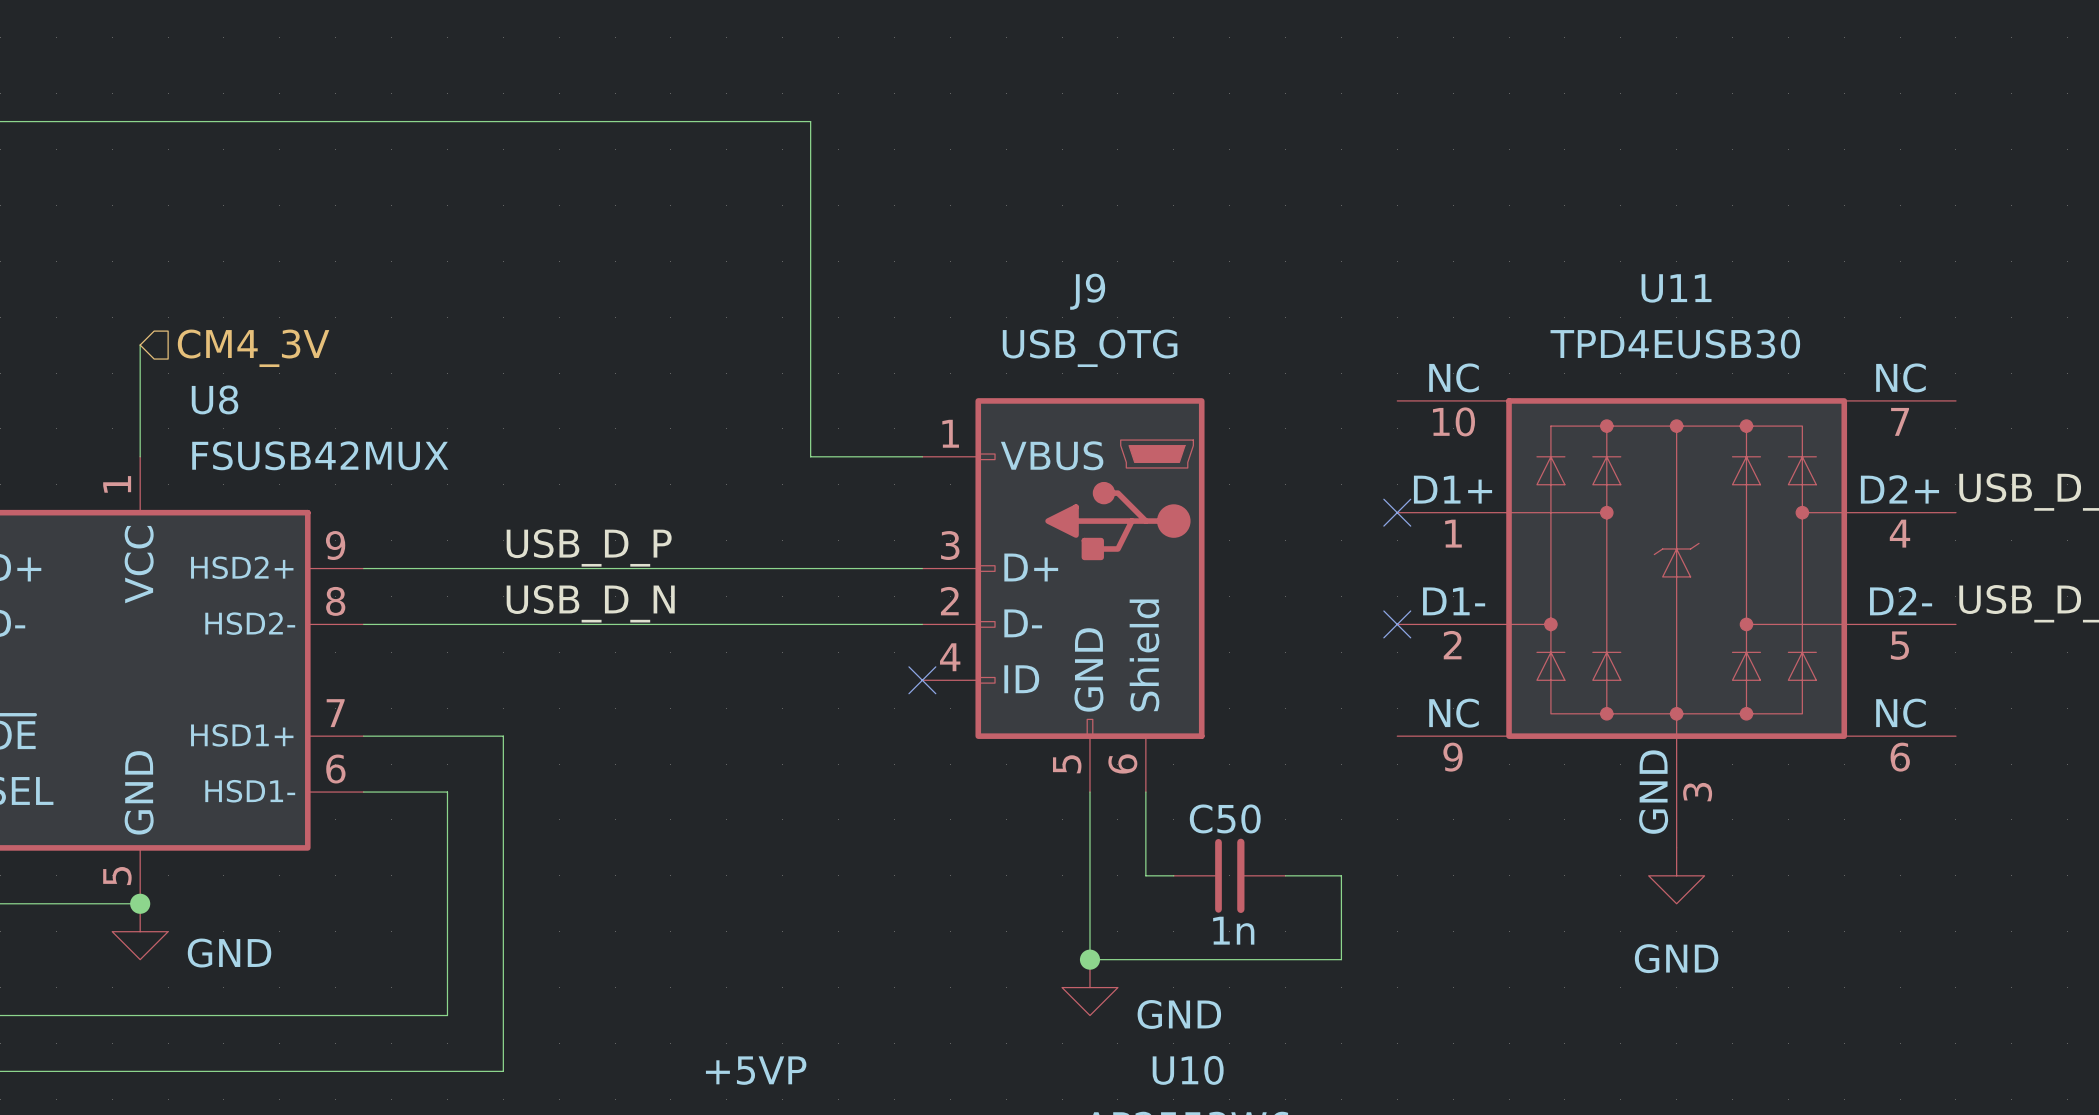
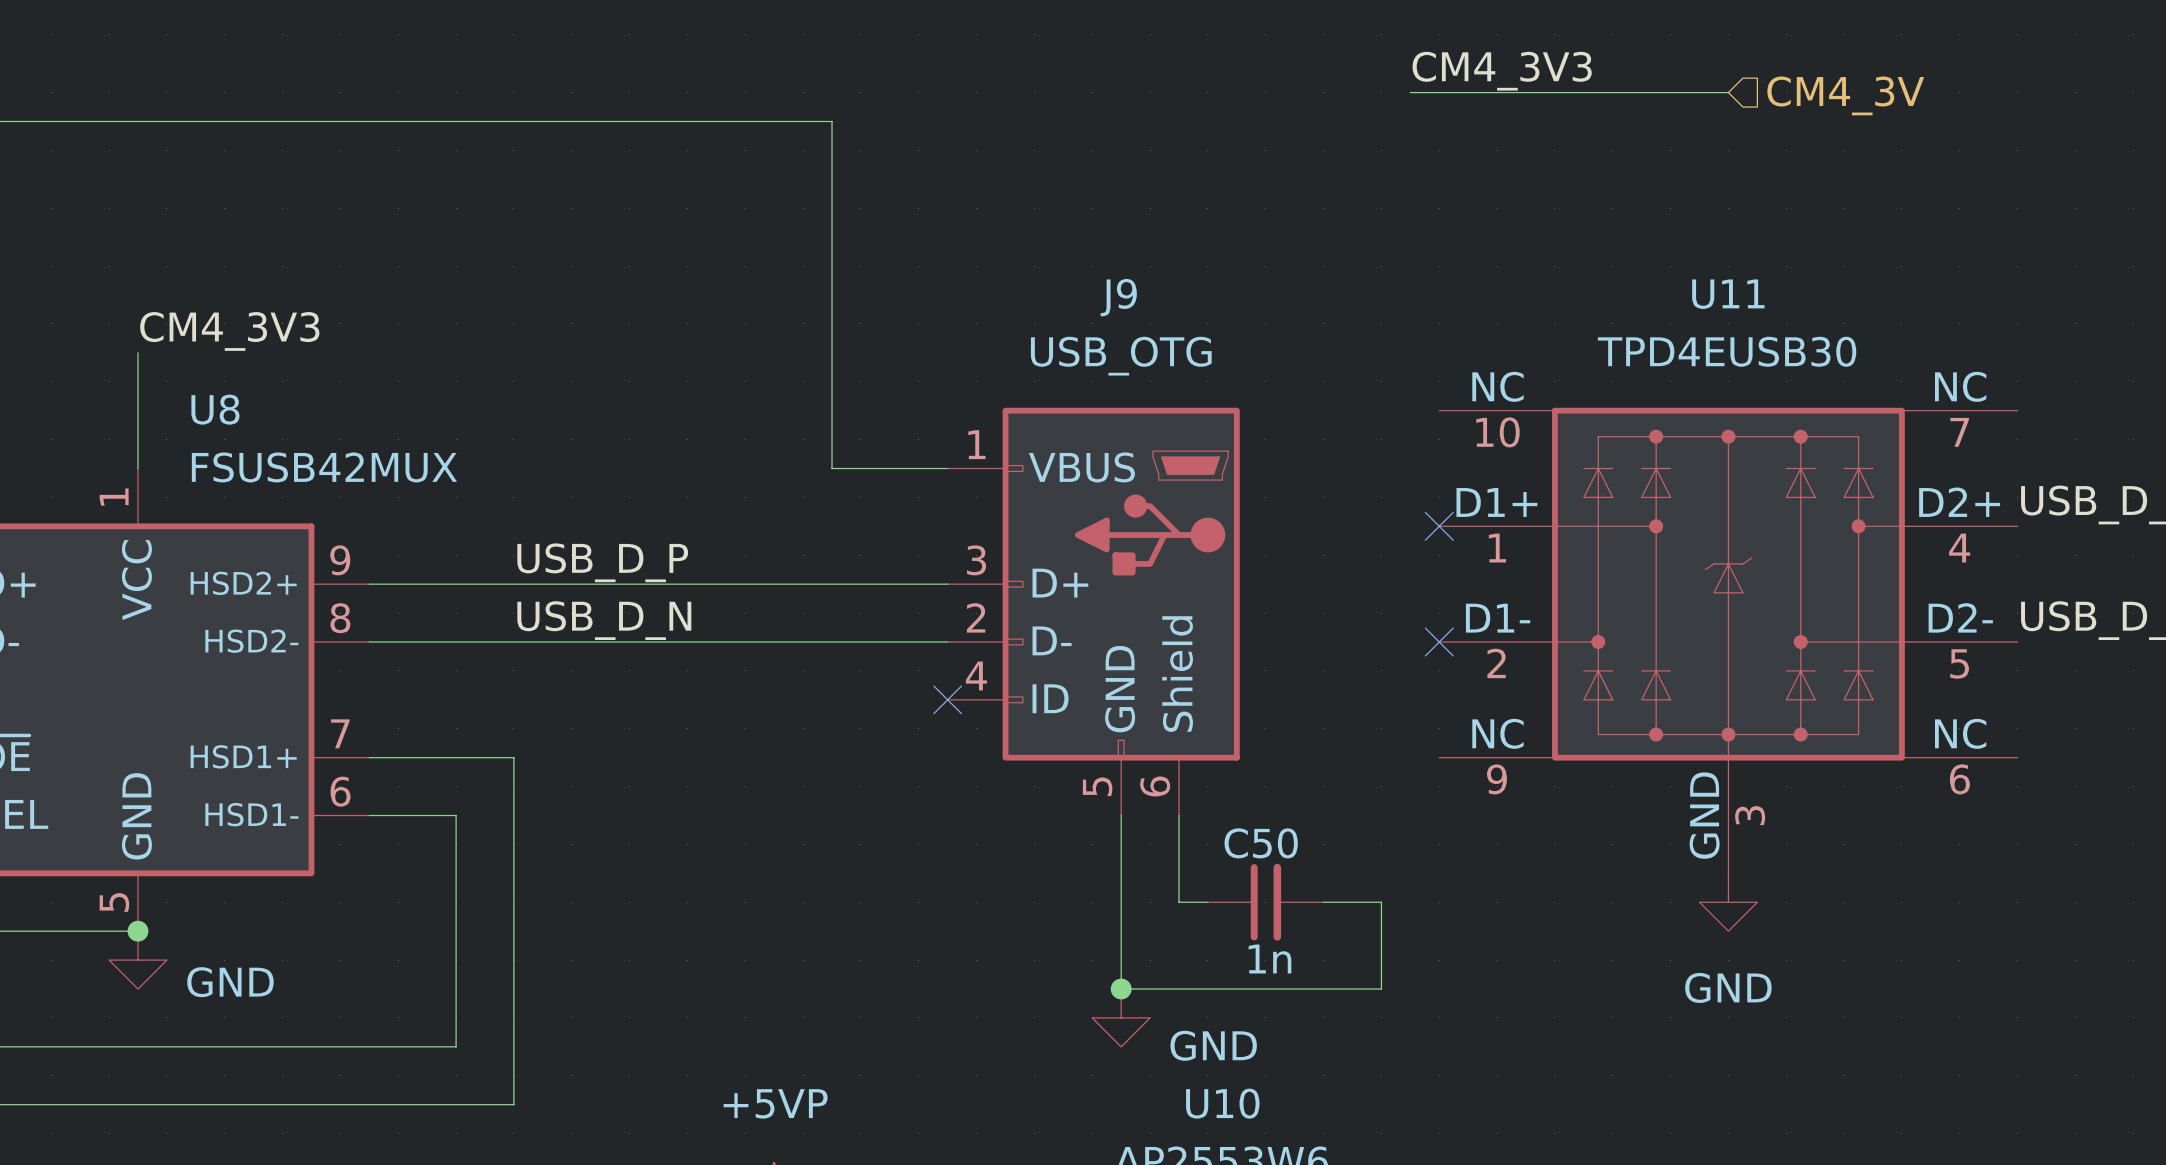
label: none -> CM4_3V3 (1502, 71)
wire: none -> (1410, 92) (1728, 92)
hierarchical label: none -> CM4_3V (1845, 95)
label: none -> CM4_3V3 (229, 331)
hierarchical label: CM4_3V (253, 348) -> none

